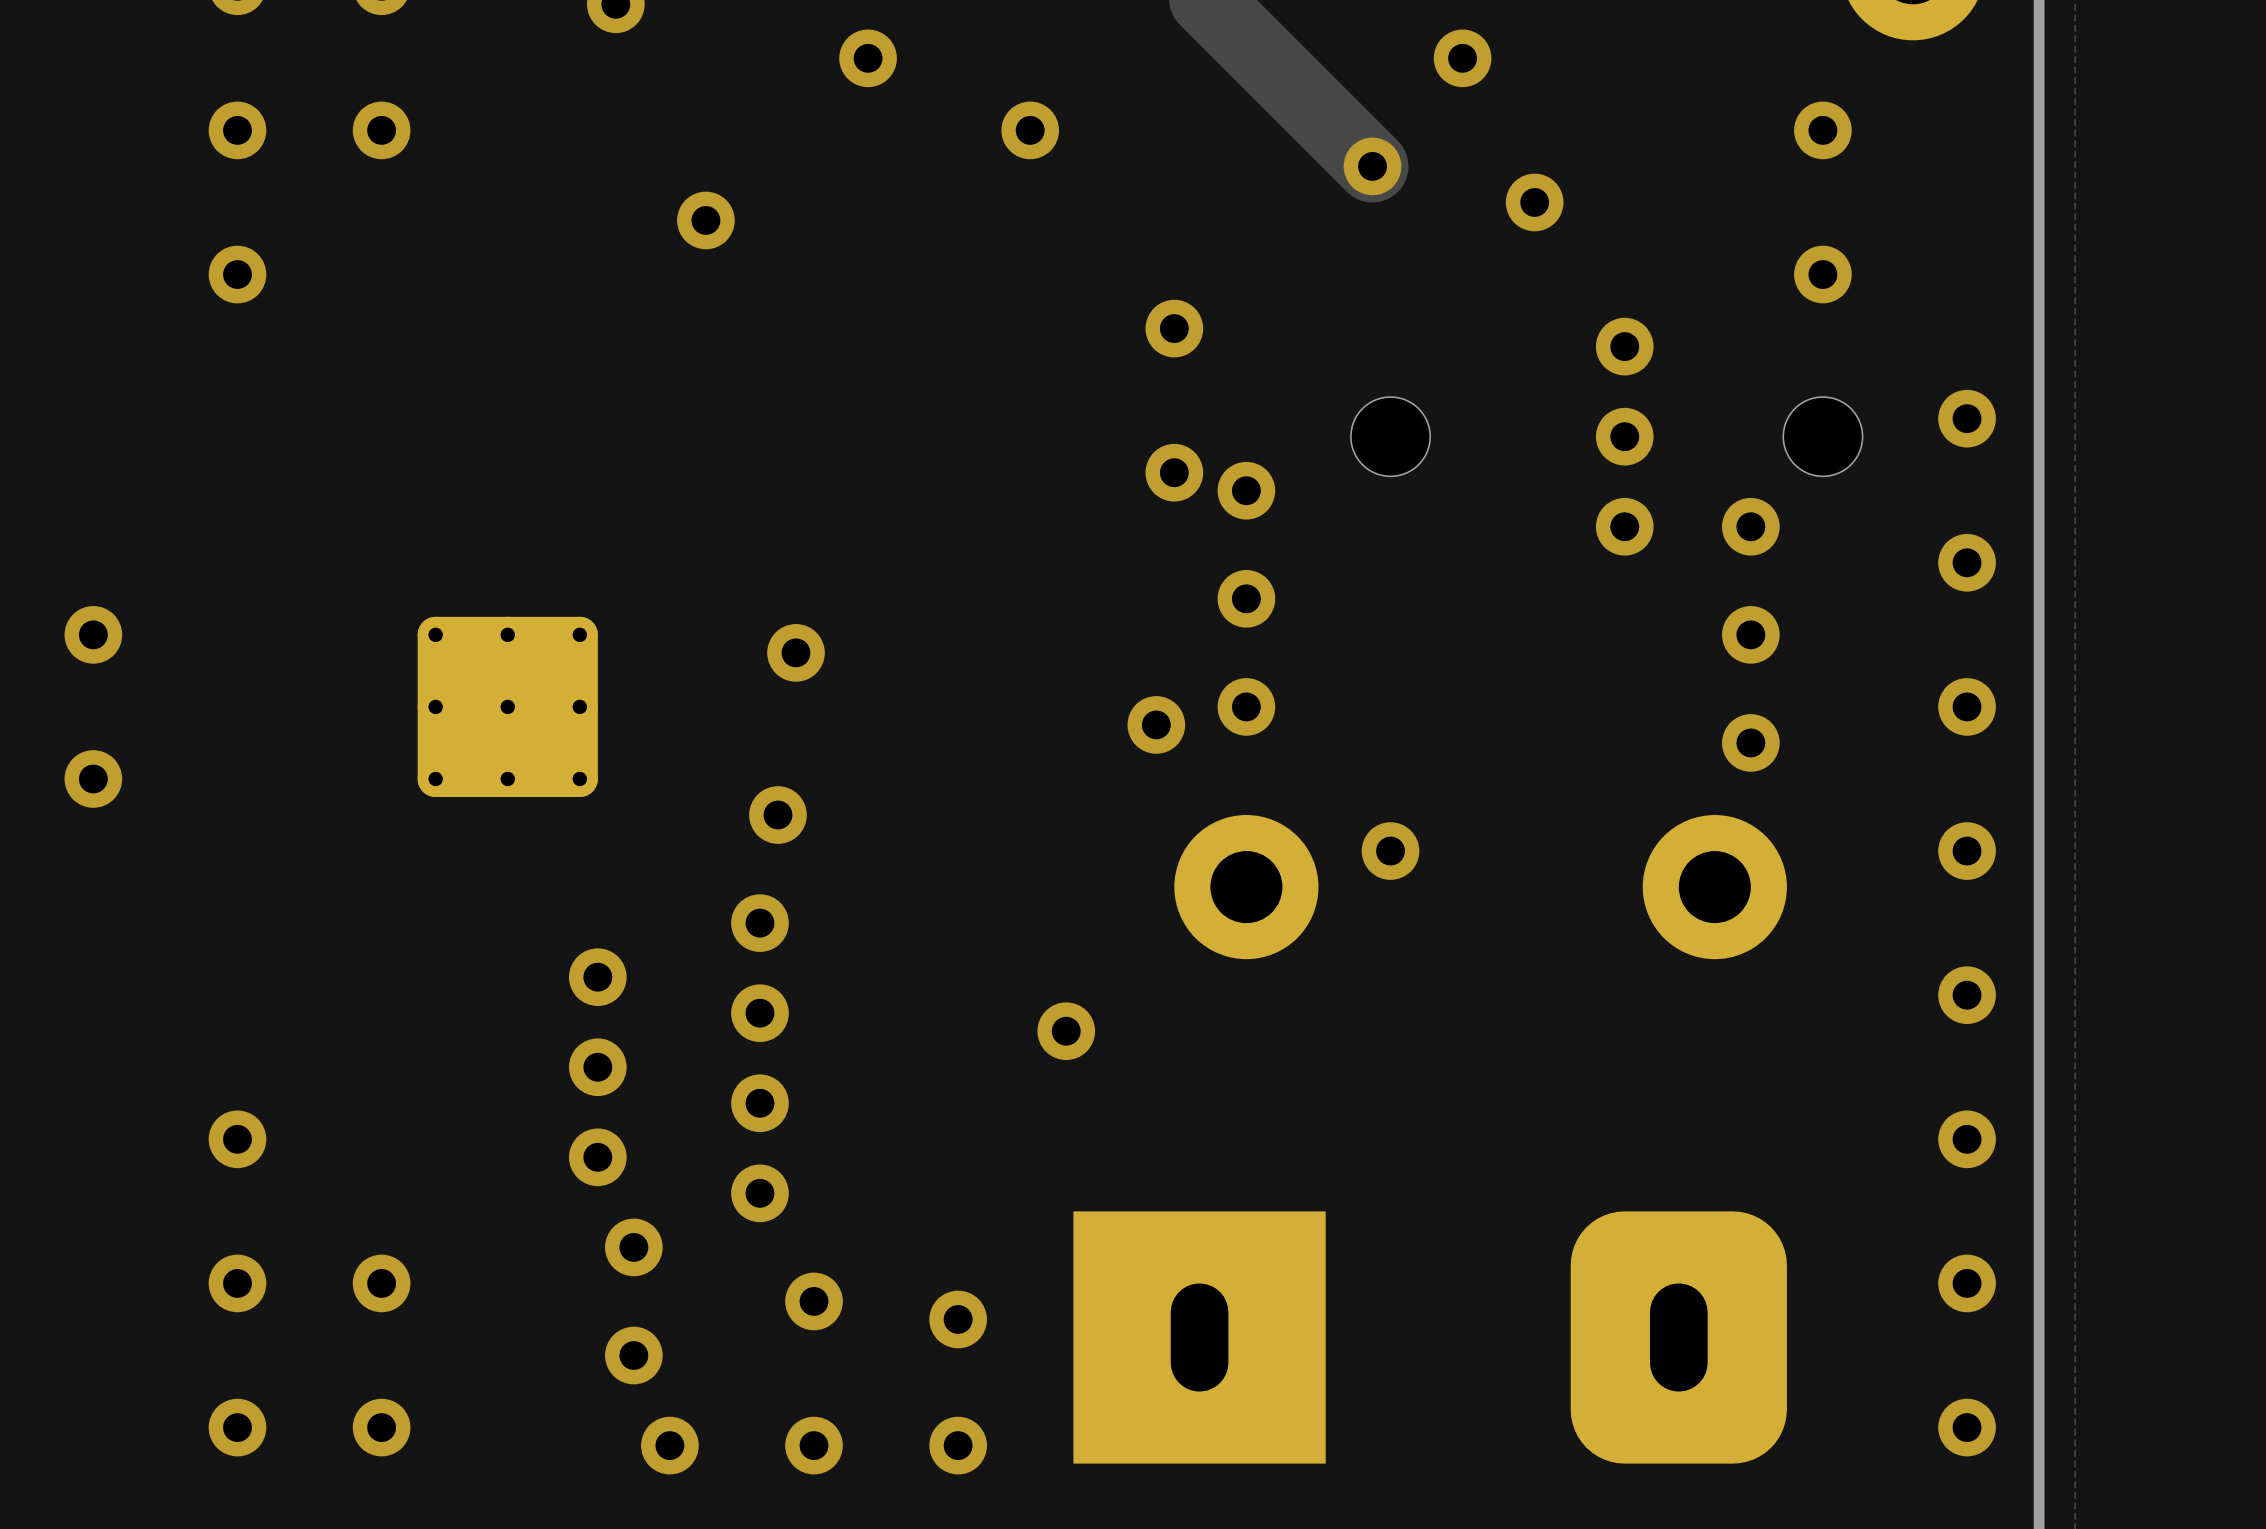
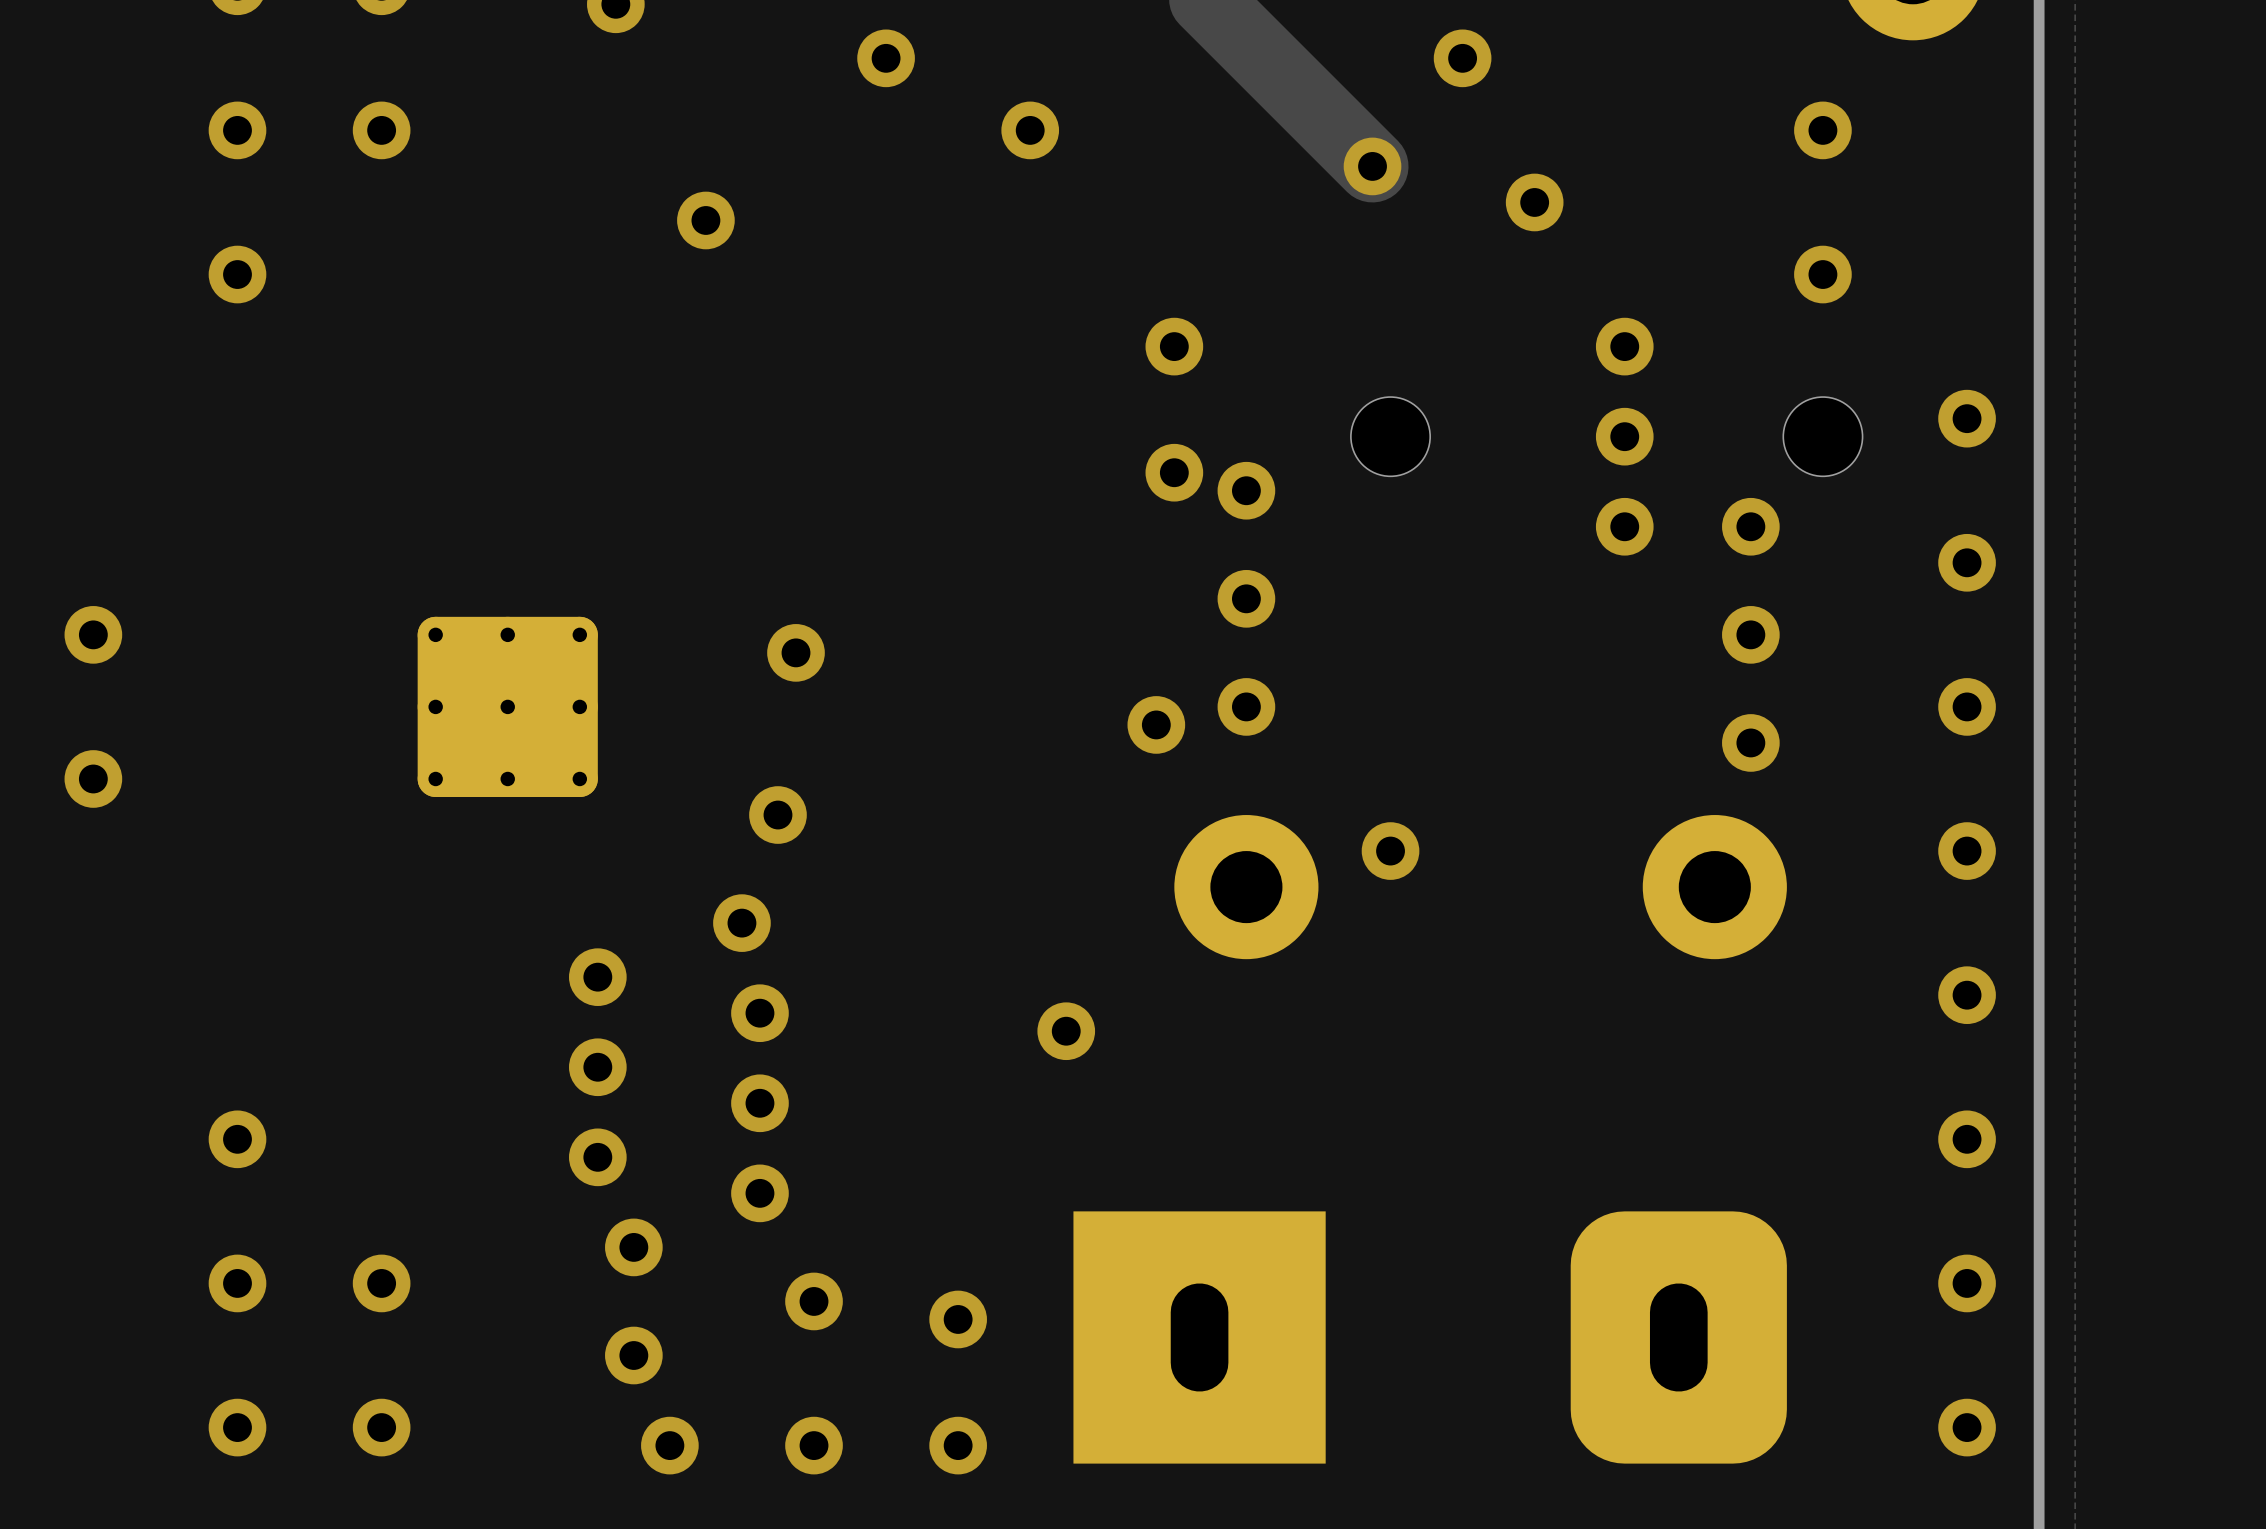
via position: (868, 58) -> (886, 58)
via position: (1174, 328) -> (1174, 346)
via position: (759, 923) -> (741, 923)

